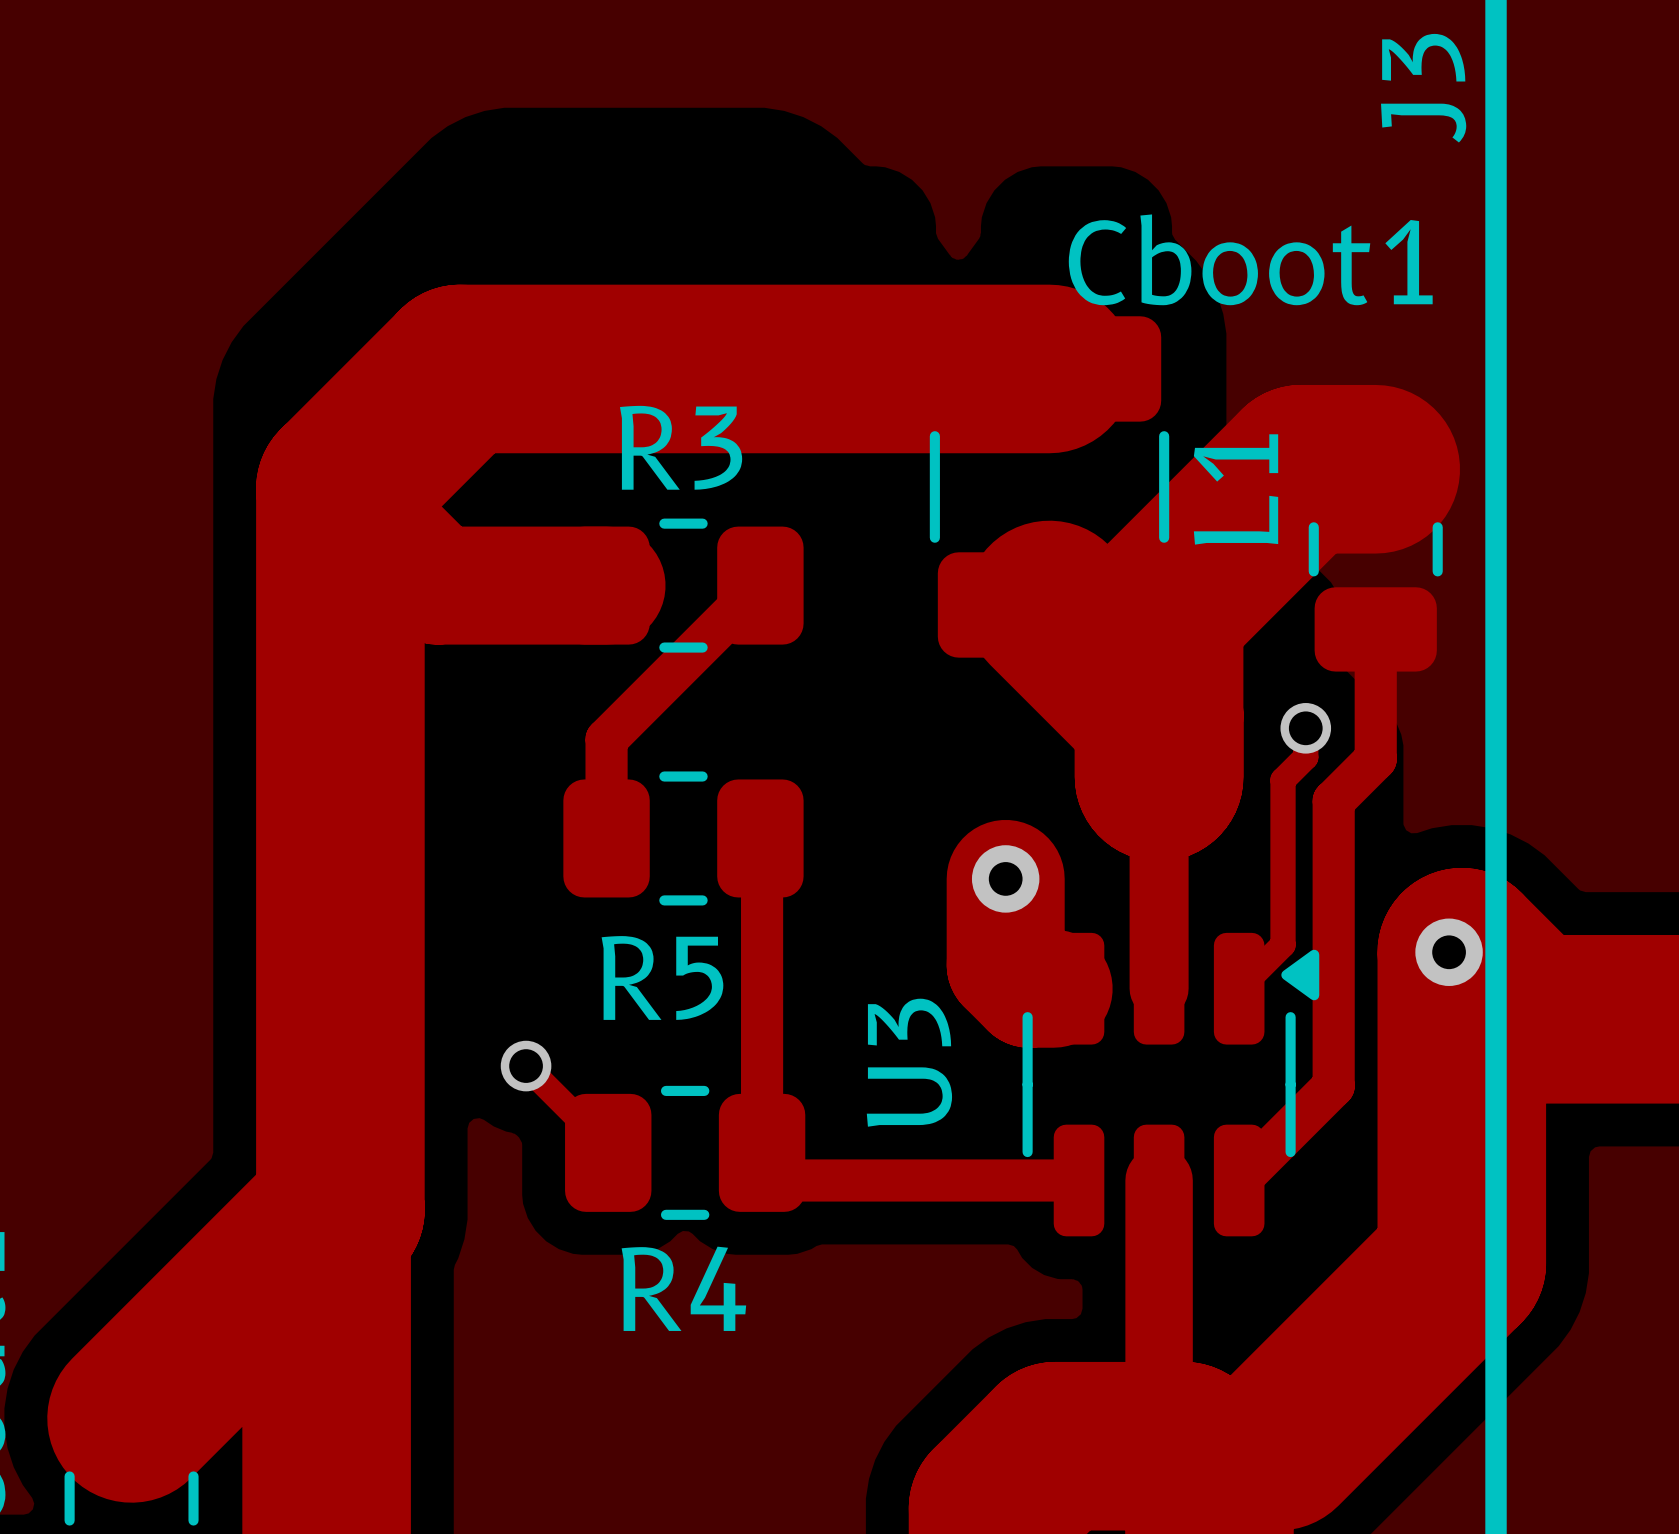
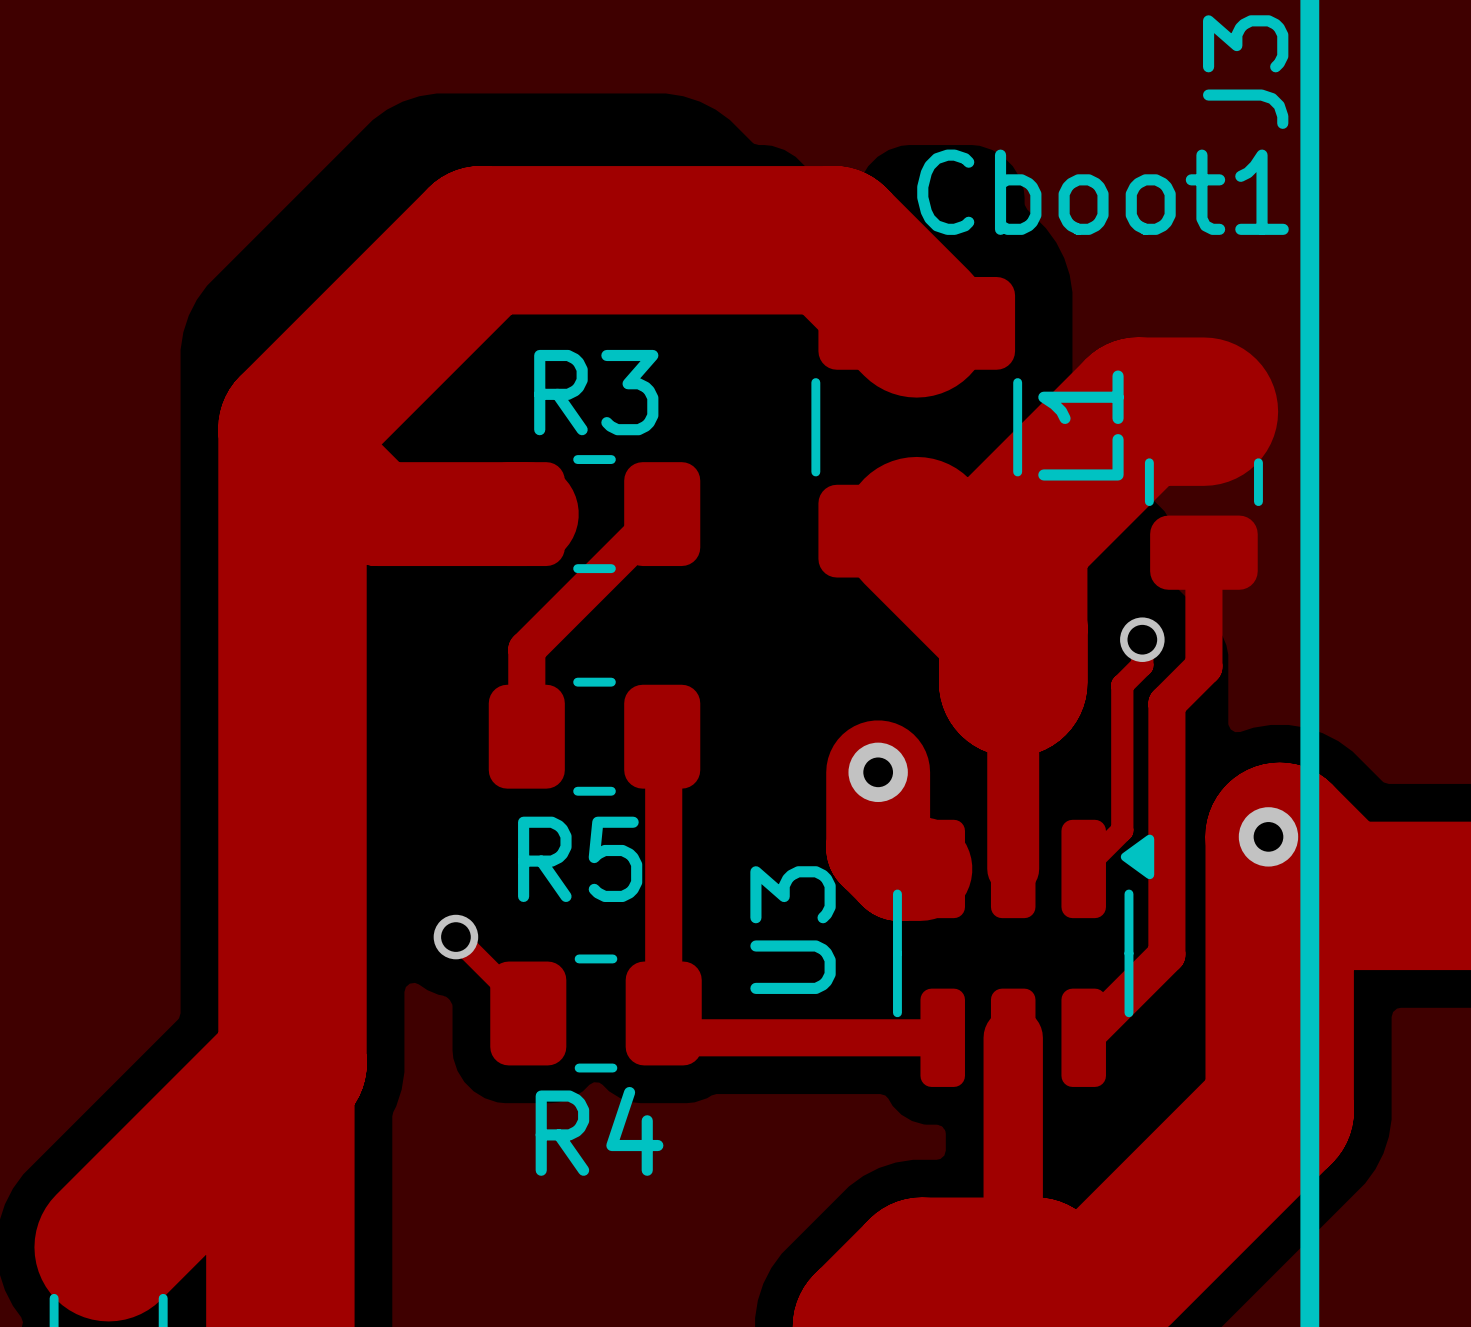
Cboot1 name position: Cboot1 (1250, 259) -> Cboot1 (1103, 192)
track: (460, 368) (1049, 368) -> (397, 323) (480, 240) (833, 240) (916, 323)

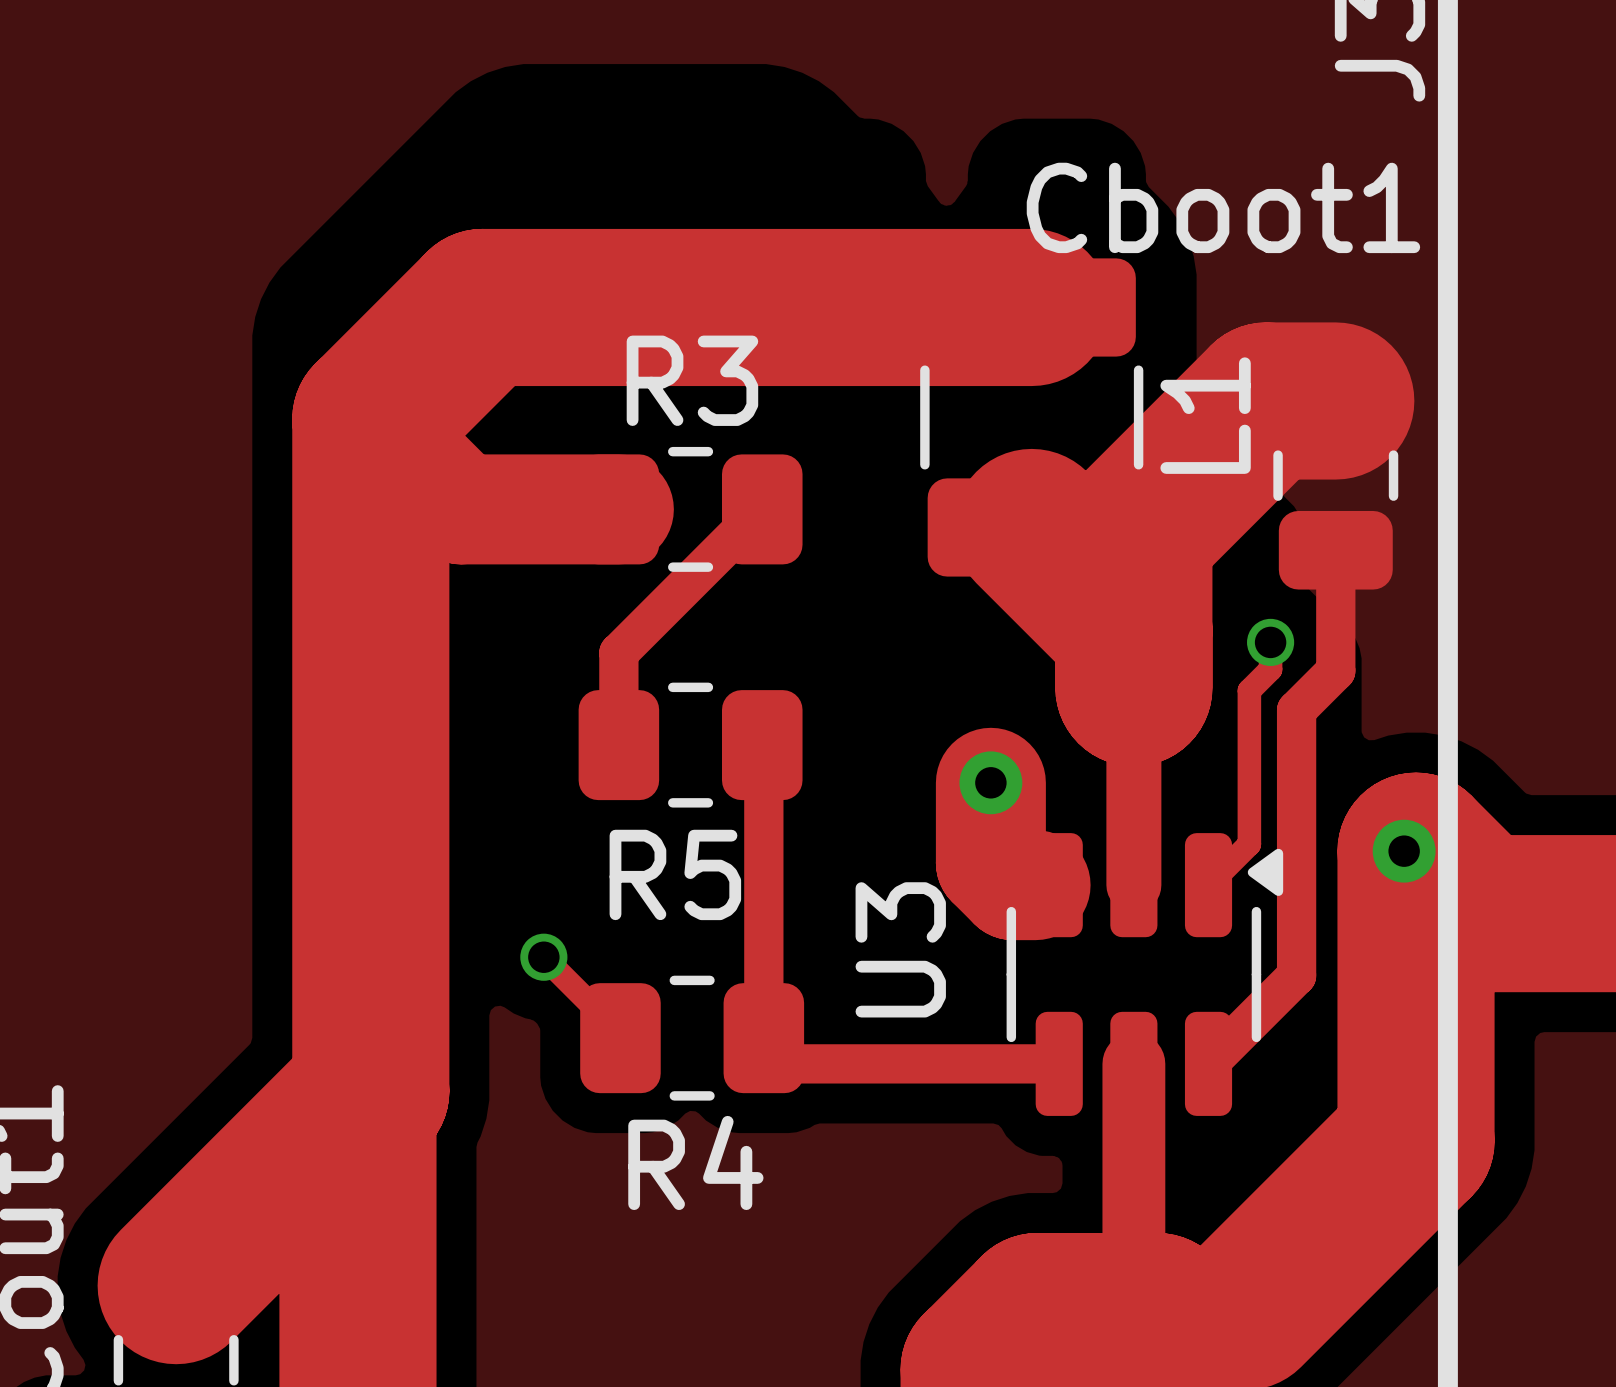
Cboot1 name position: Cboot1 (1103, 192) -> Cboot1 (1223, 207)
track: (397, 323) (480, 240) (833, 240) (916, 323) -> (482, 307) (1031, 307)

